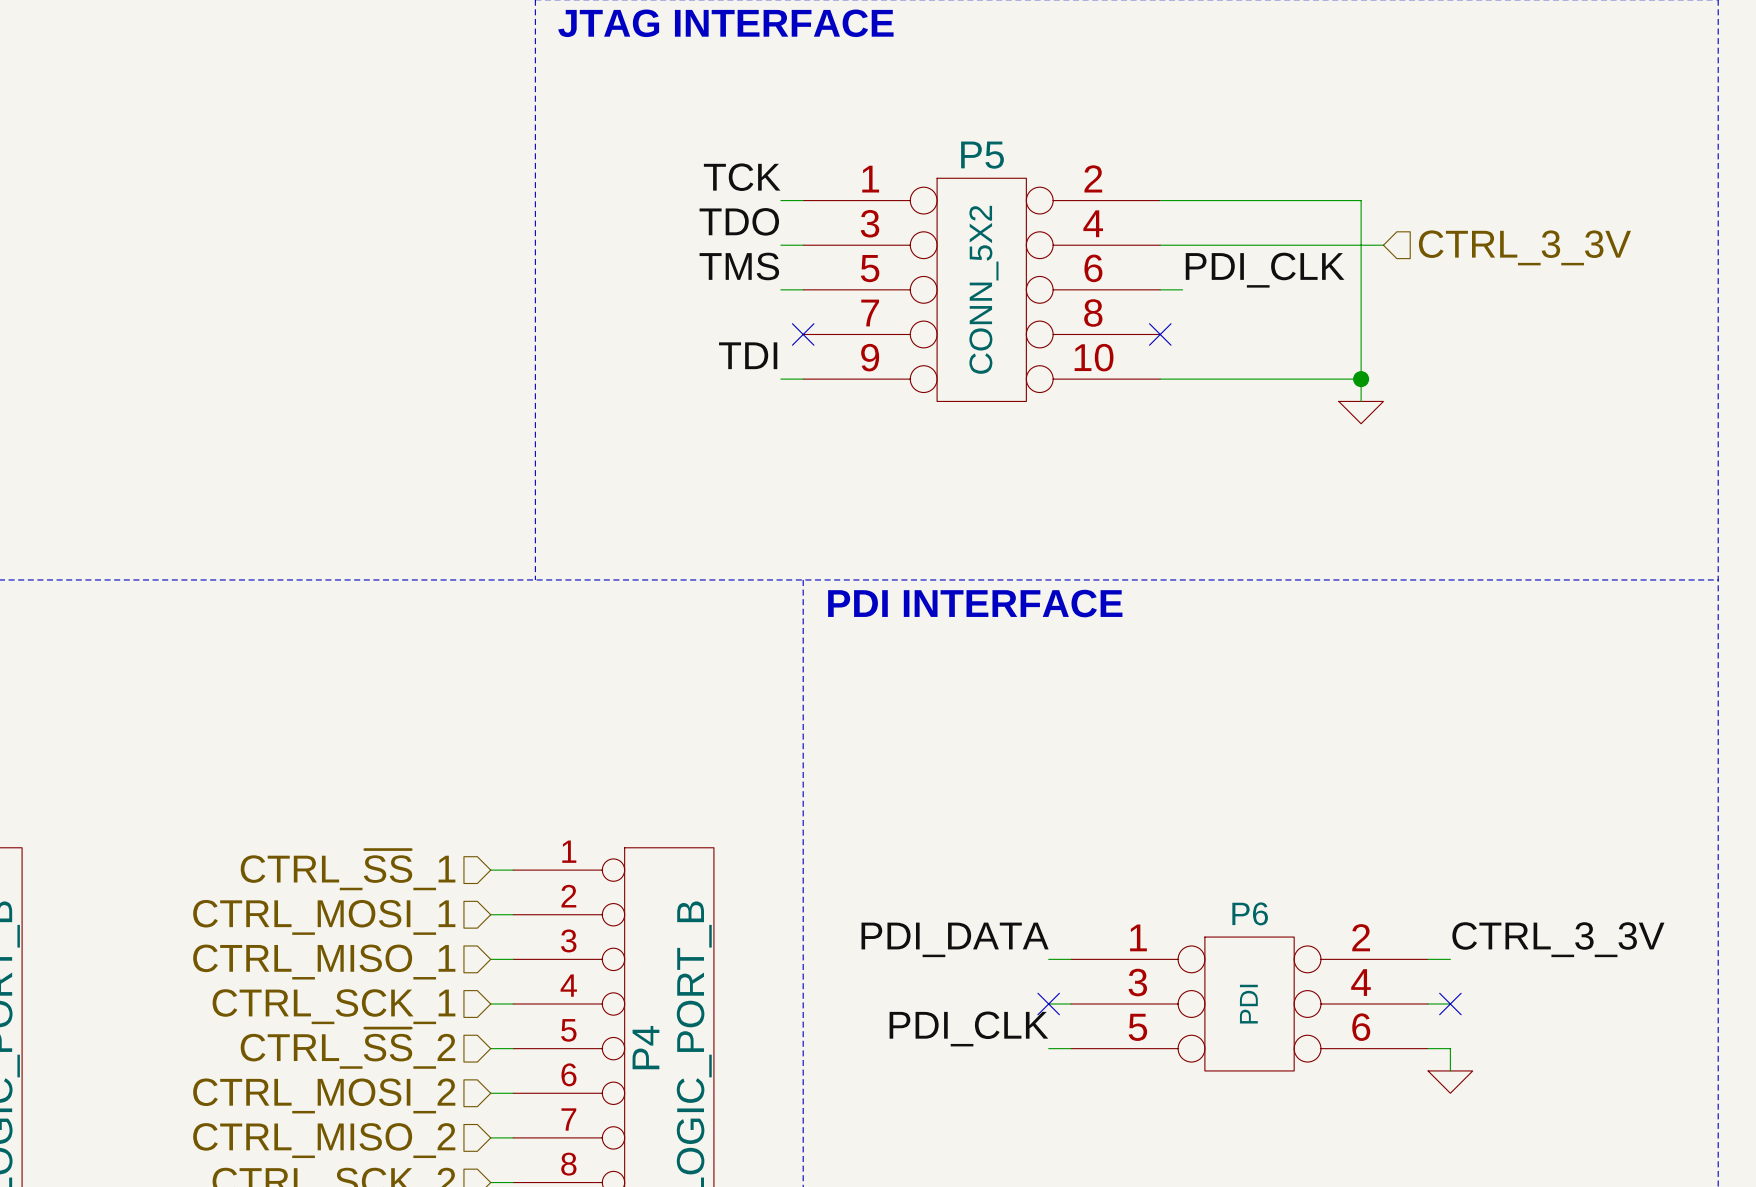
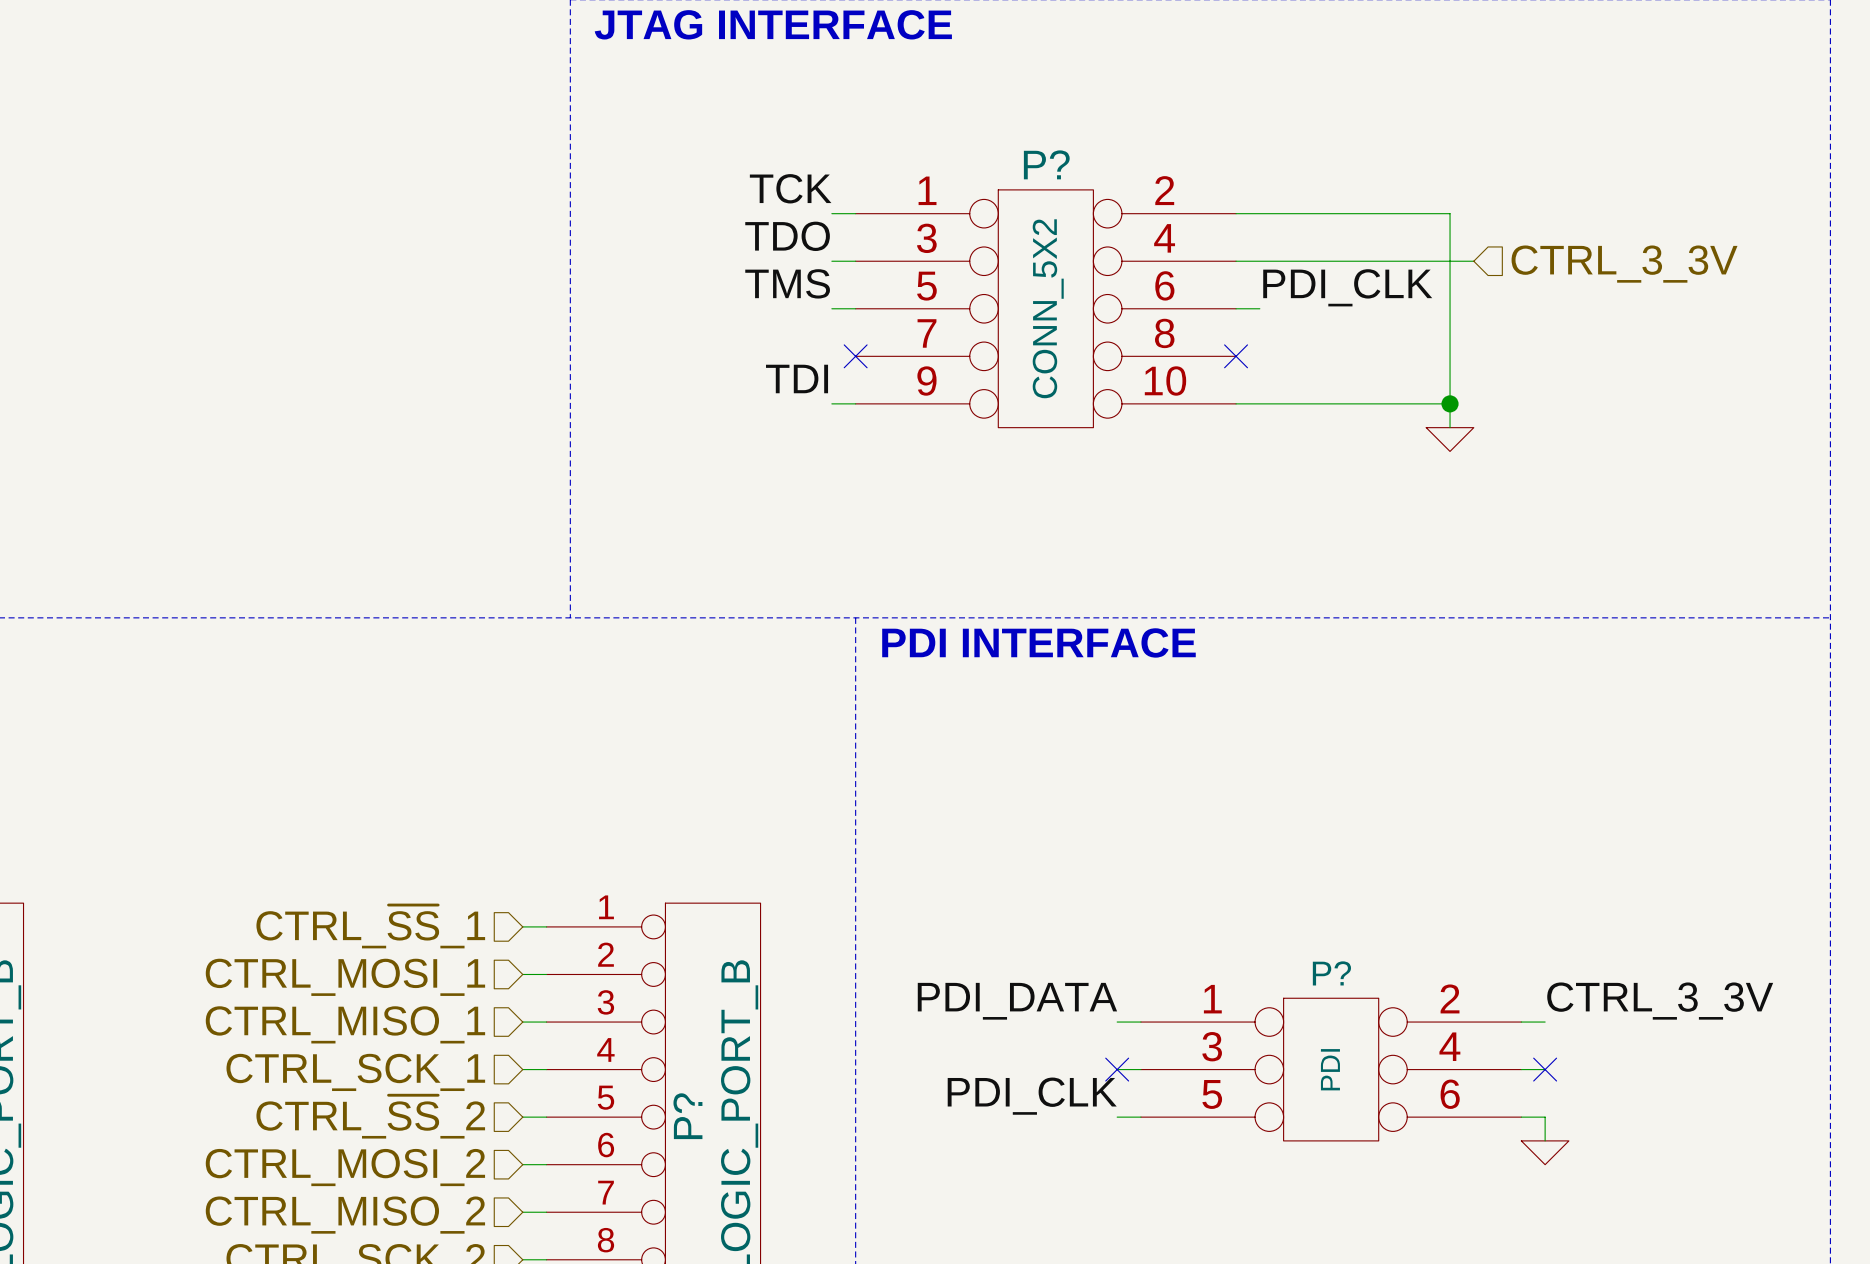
P5 name: P5 (982, 155) -> P? (1046, 164)
P6 name: P6 (1250, 913) -> P? (1331, 973)
P4 name: P4 (645, 1047) -> P? (687, 1116)

